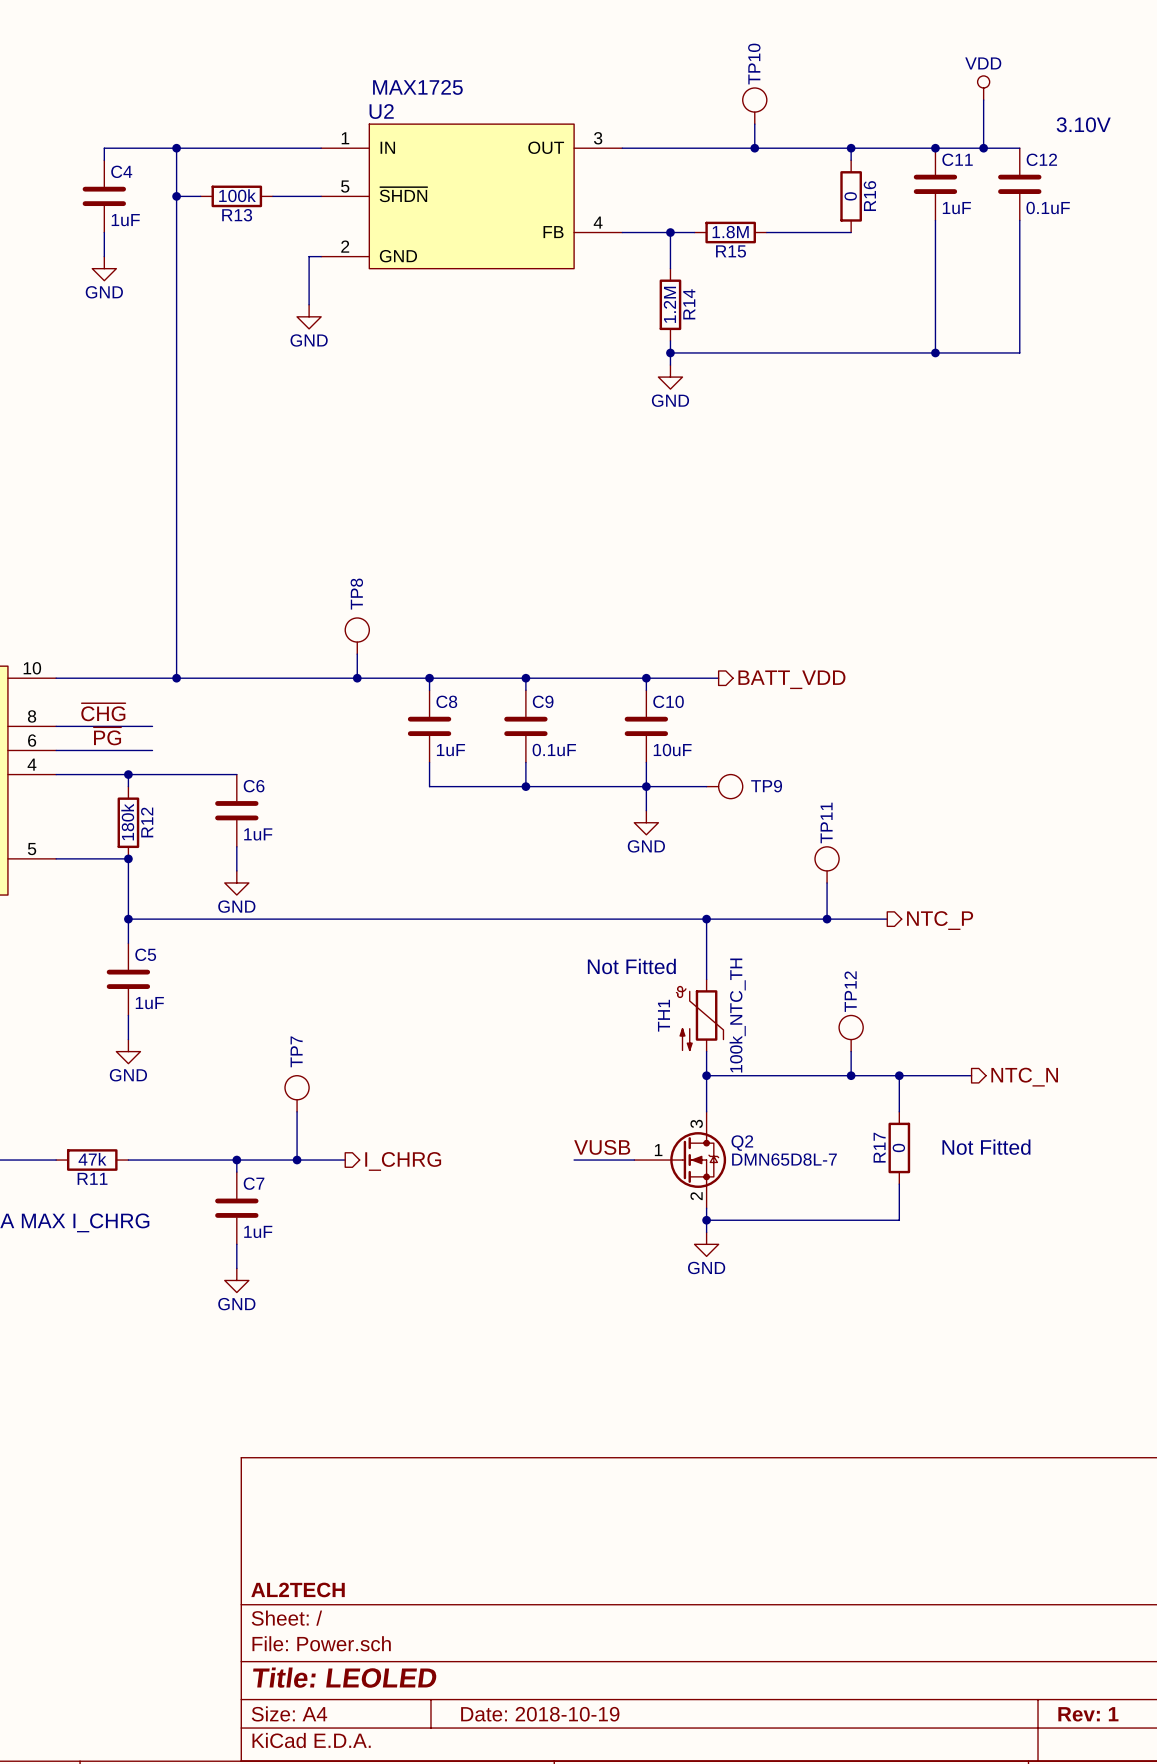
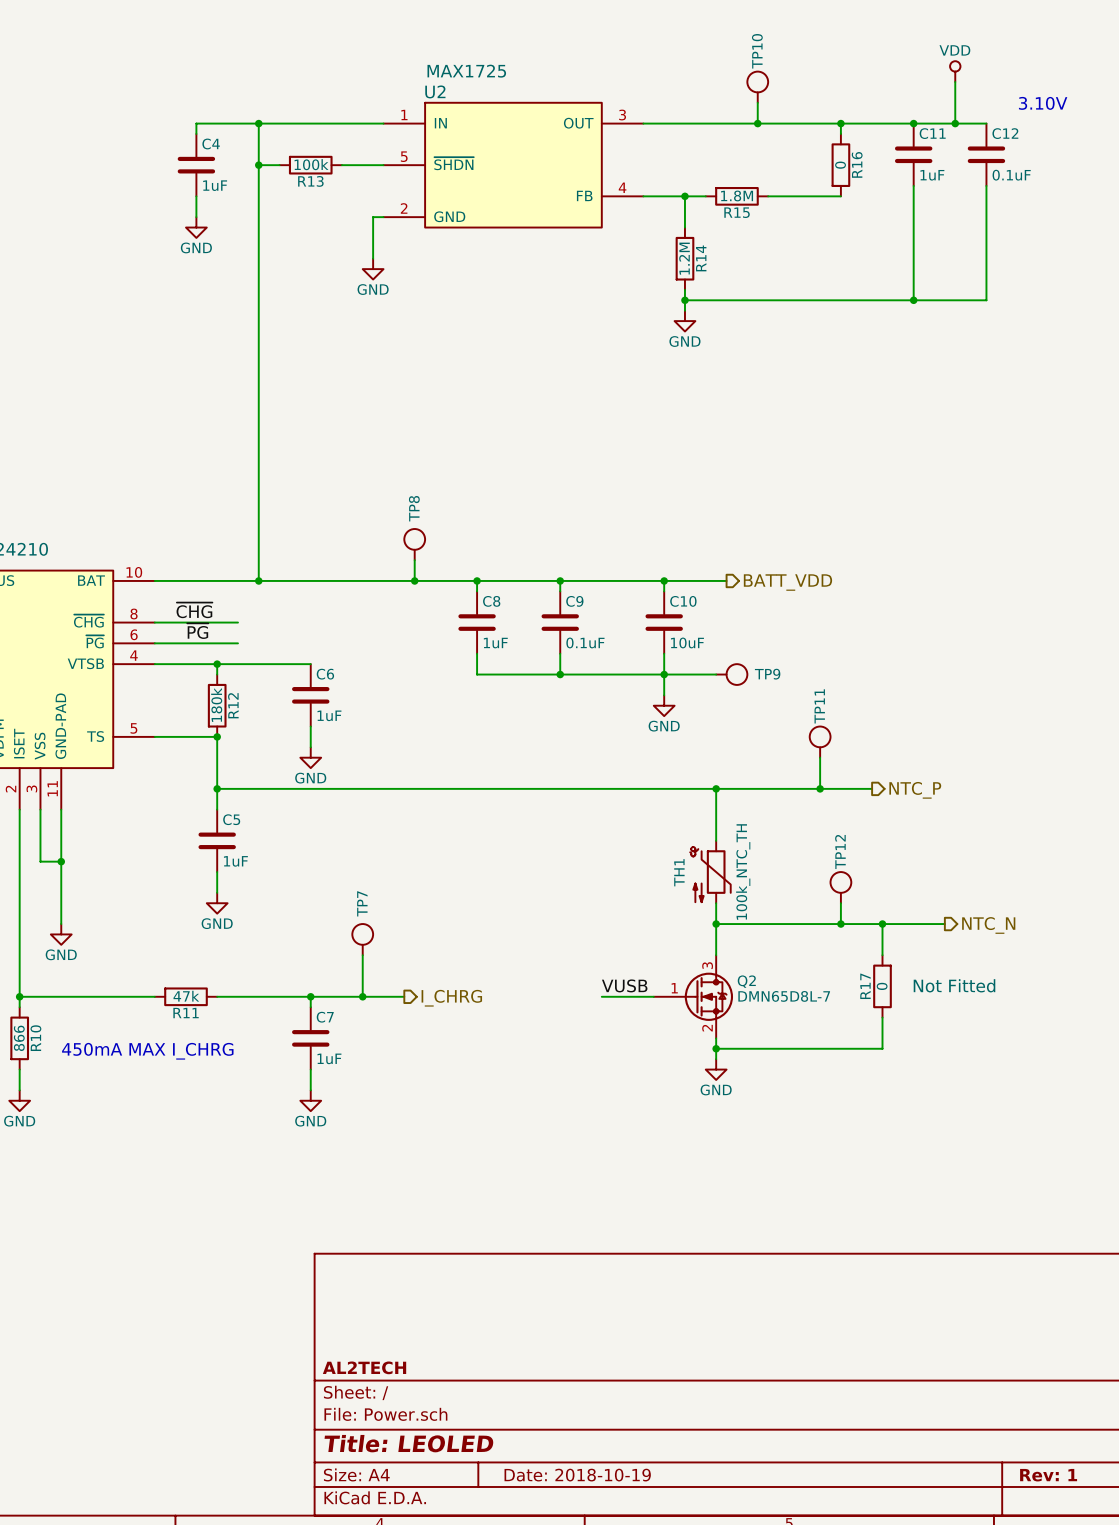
TH1 text: Not Fitted (631, 966) -> none

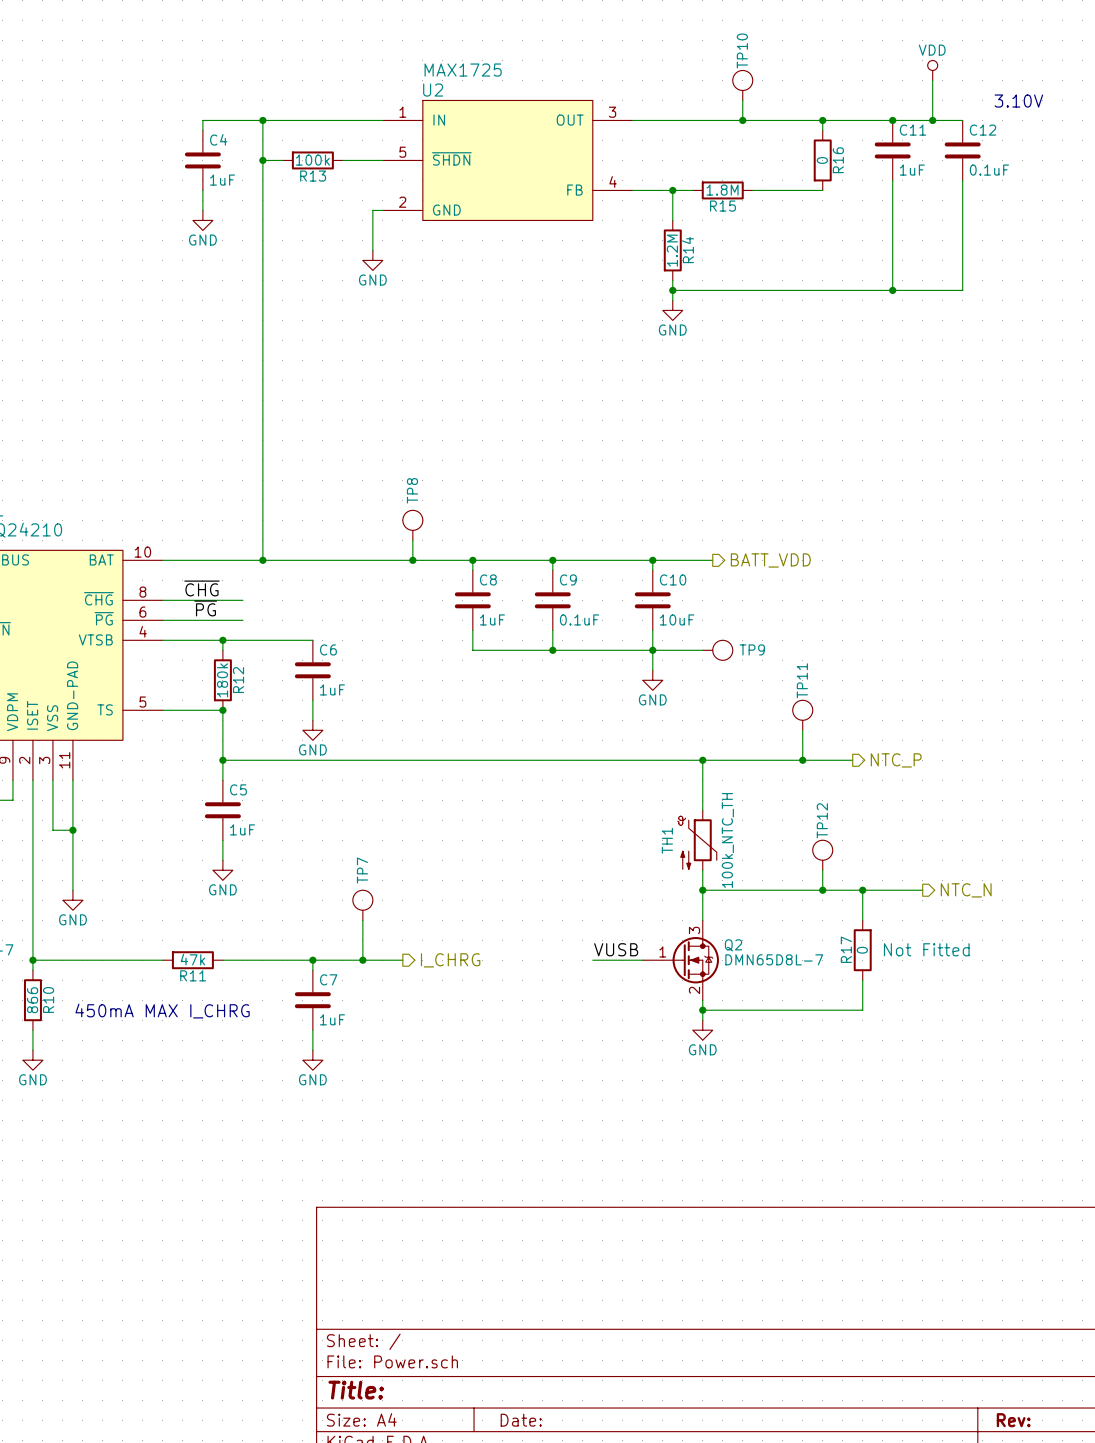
title block: AL2TECH (364, 1367) -> none
title block: Title: LEOLED (408, 1443) -> Title: (356, 1390)
title block: Date: 2018-10-19 (577, 1475) -> Date: (521, 1420)
title block: Rev: 1 (1048, 1475) -> Rev: (1013, 1420)

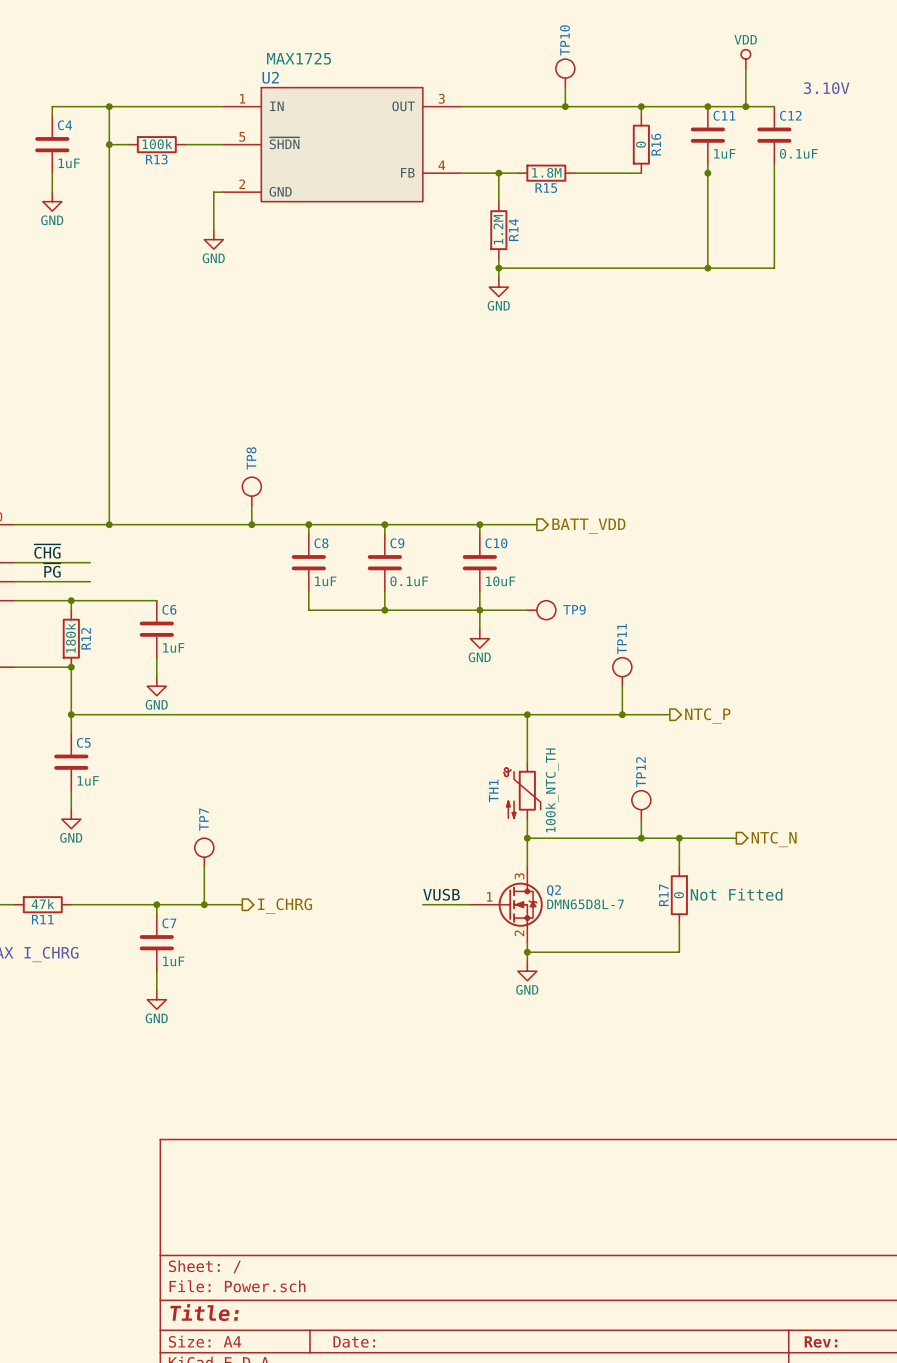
junction: none -> (707, 173)

